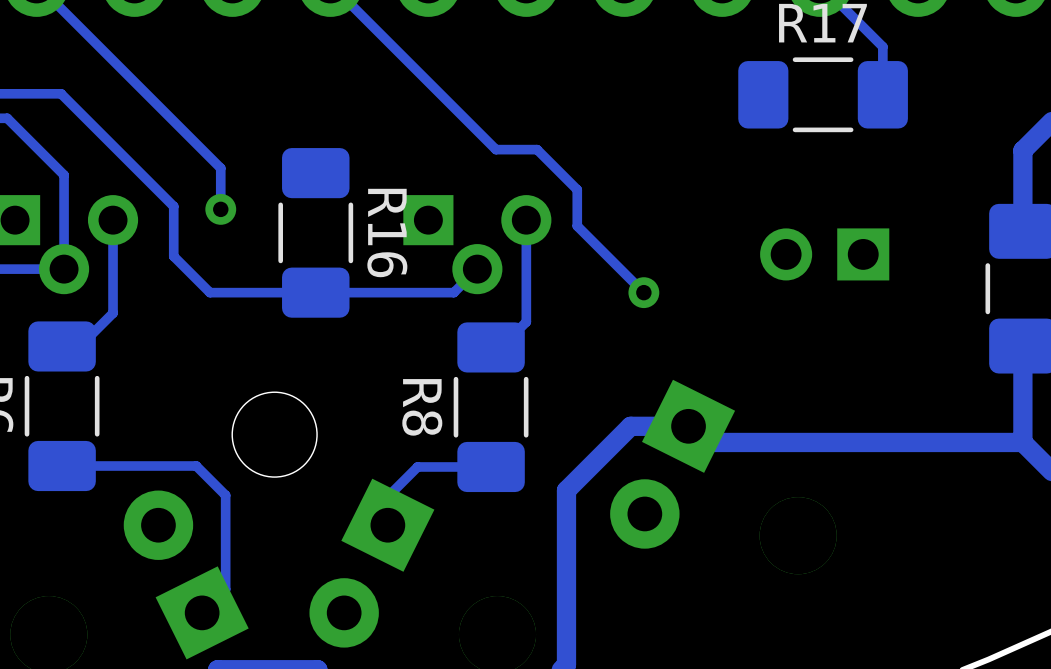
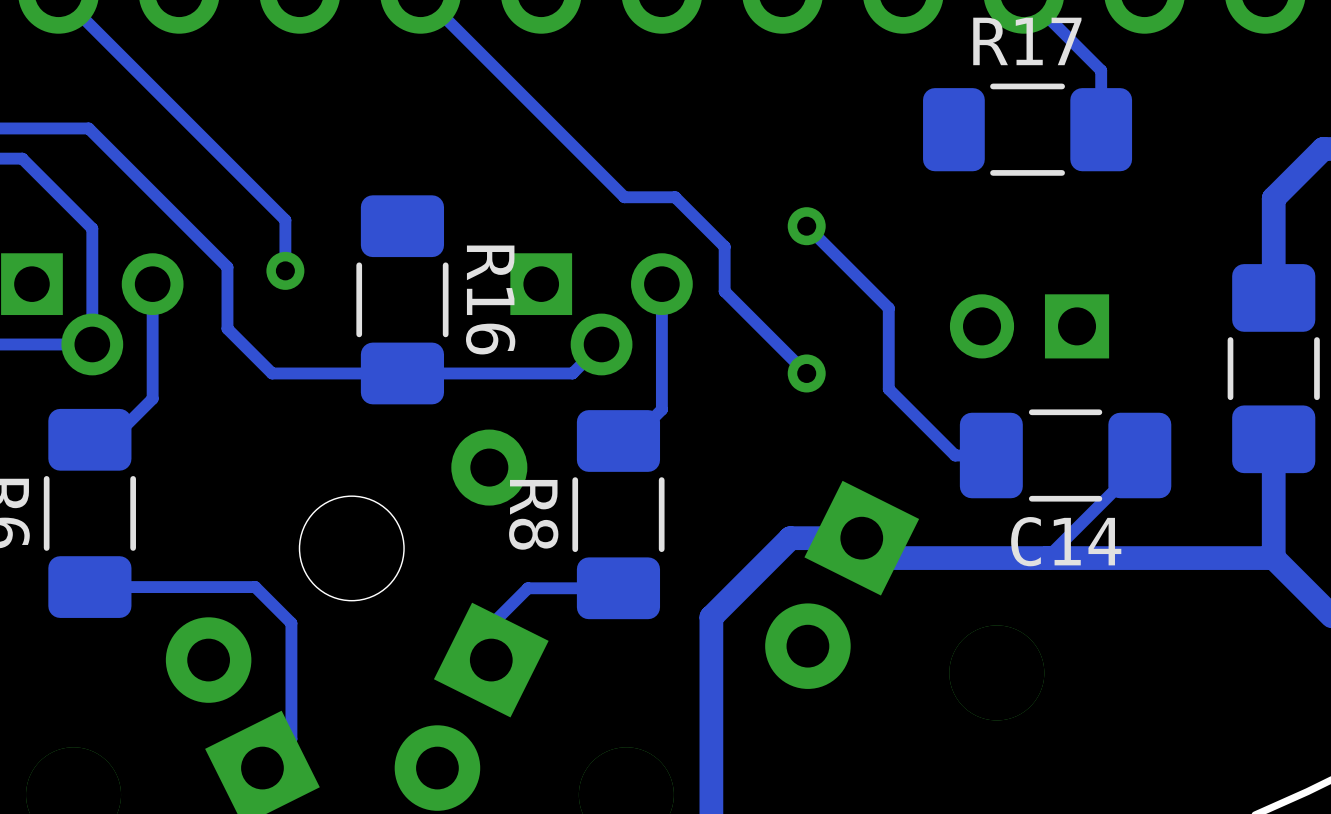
track: none -> (806, 226) (888, 308) (888, 389) (955, 455) (991, 455)
via: none -> (806, 226)
C14: none -> (1065, 455)
track: none -> (1139, 455) (1139, 465) (1046, 558)
via: none -> (489, 467)

